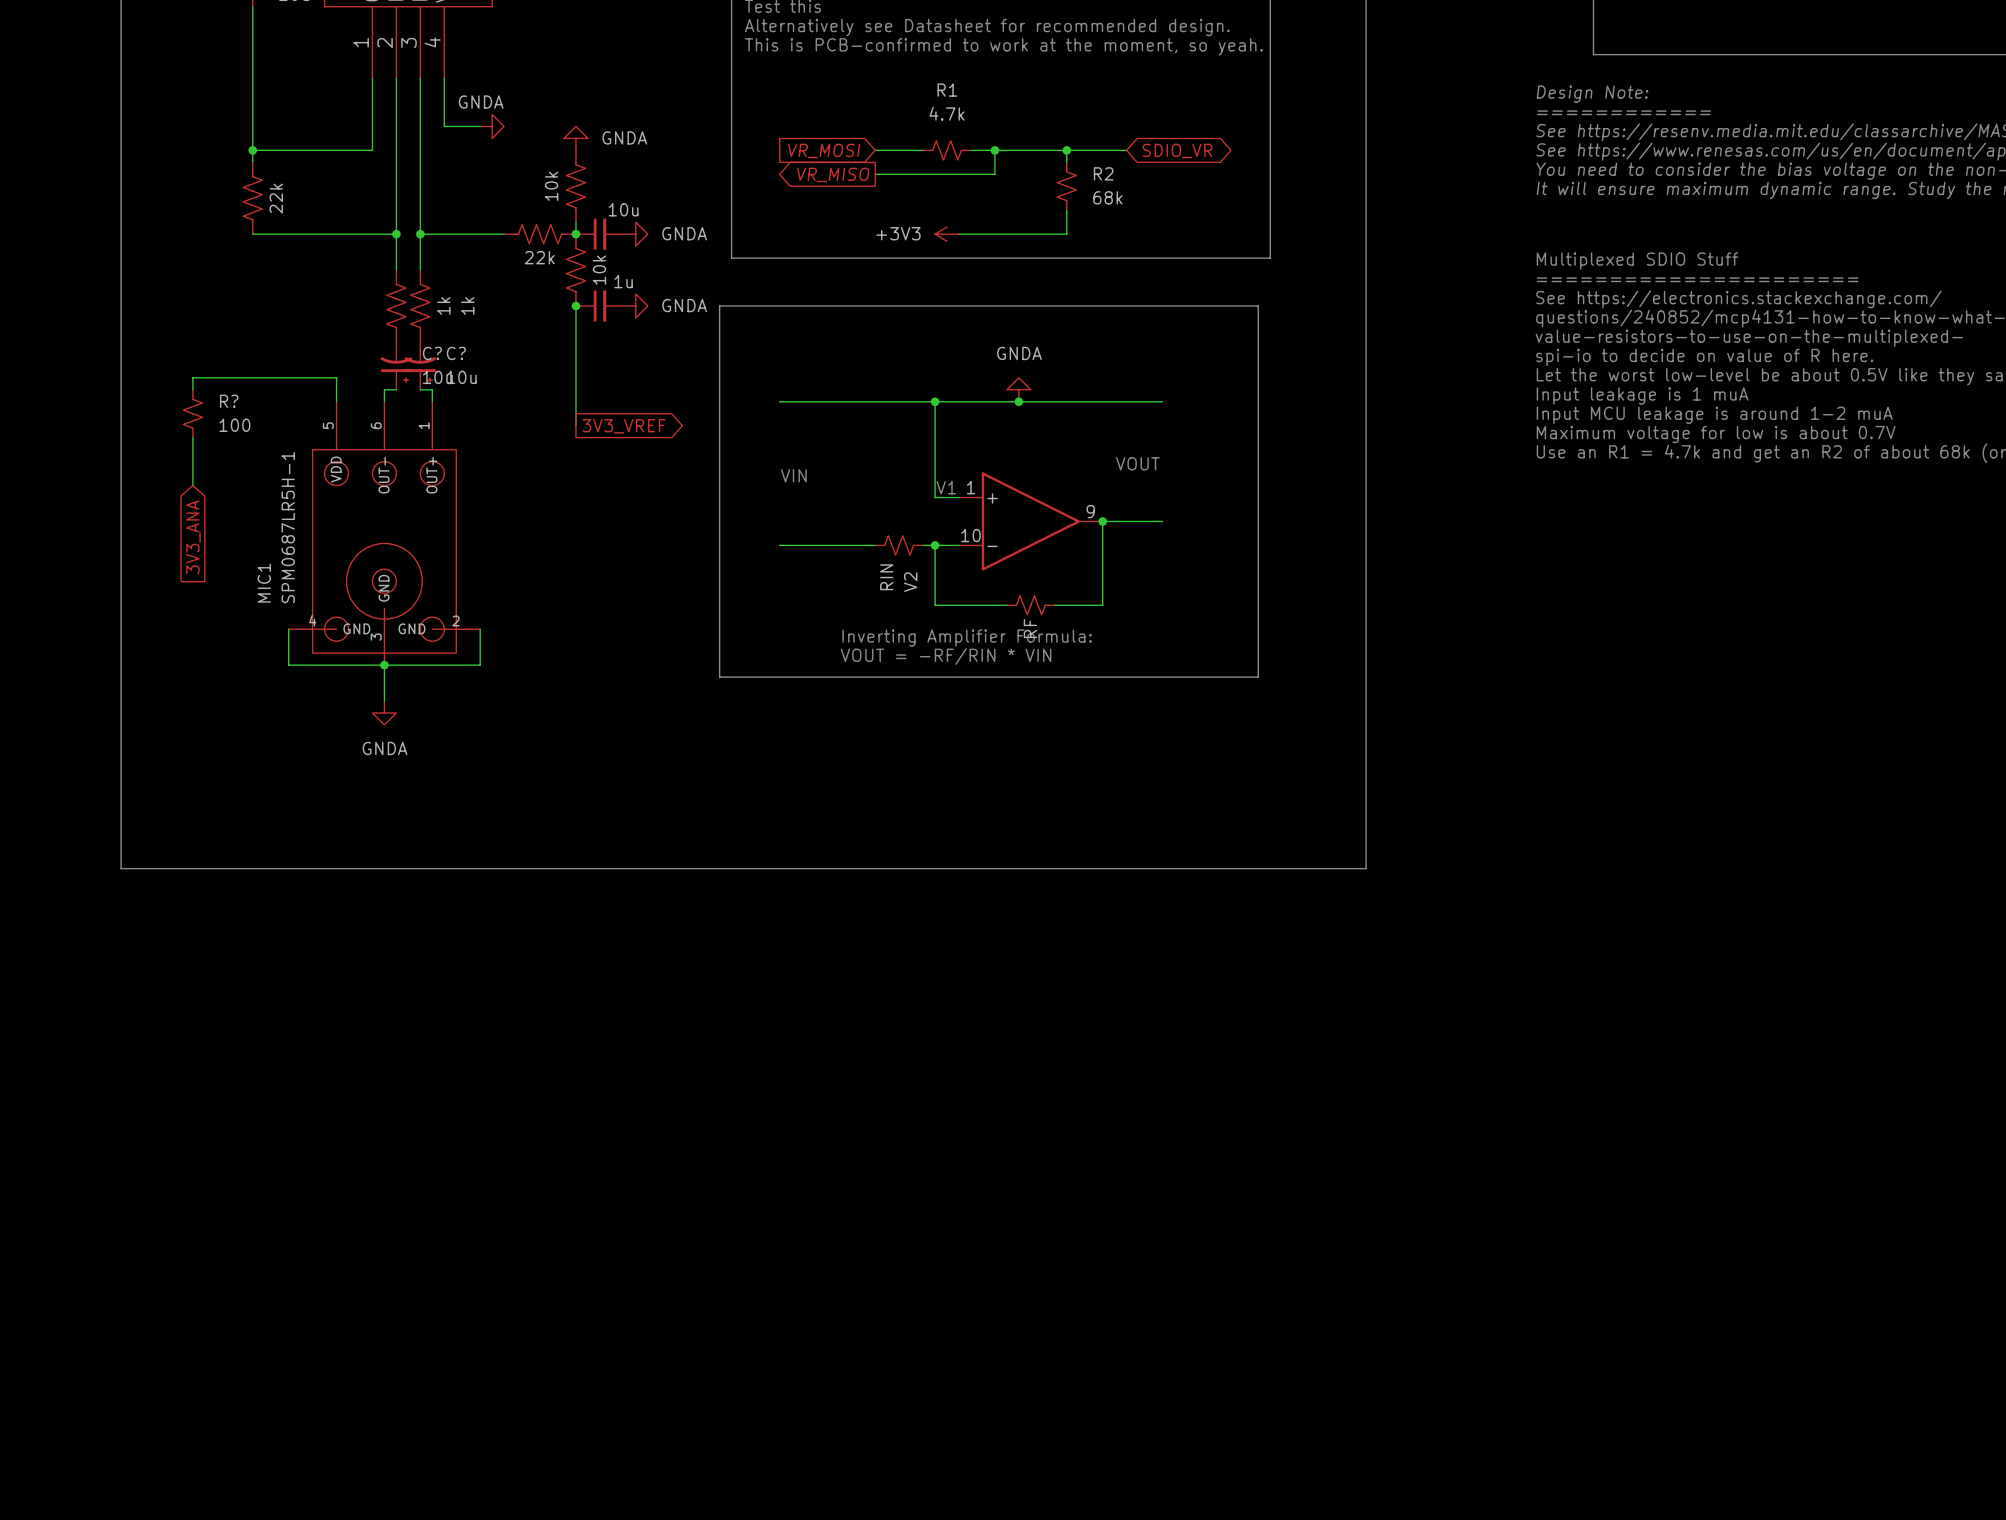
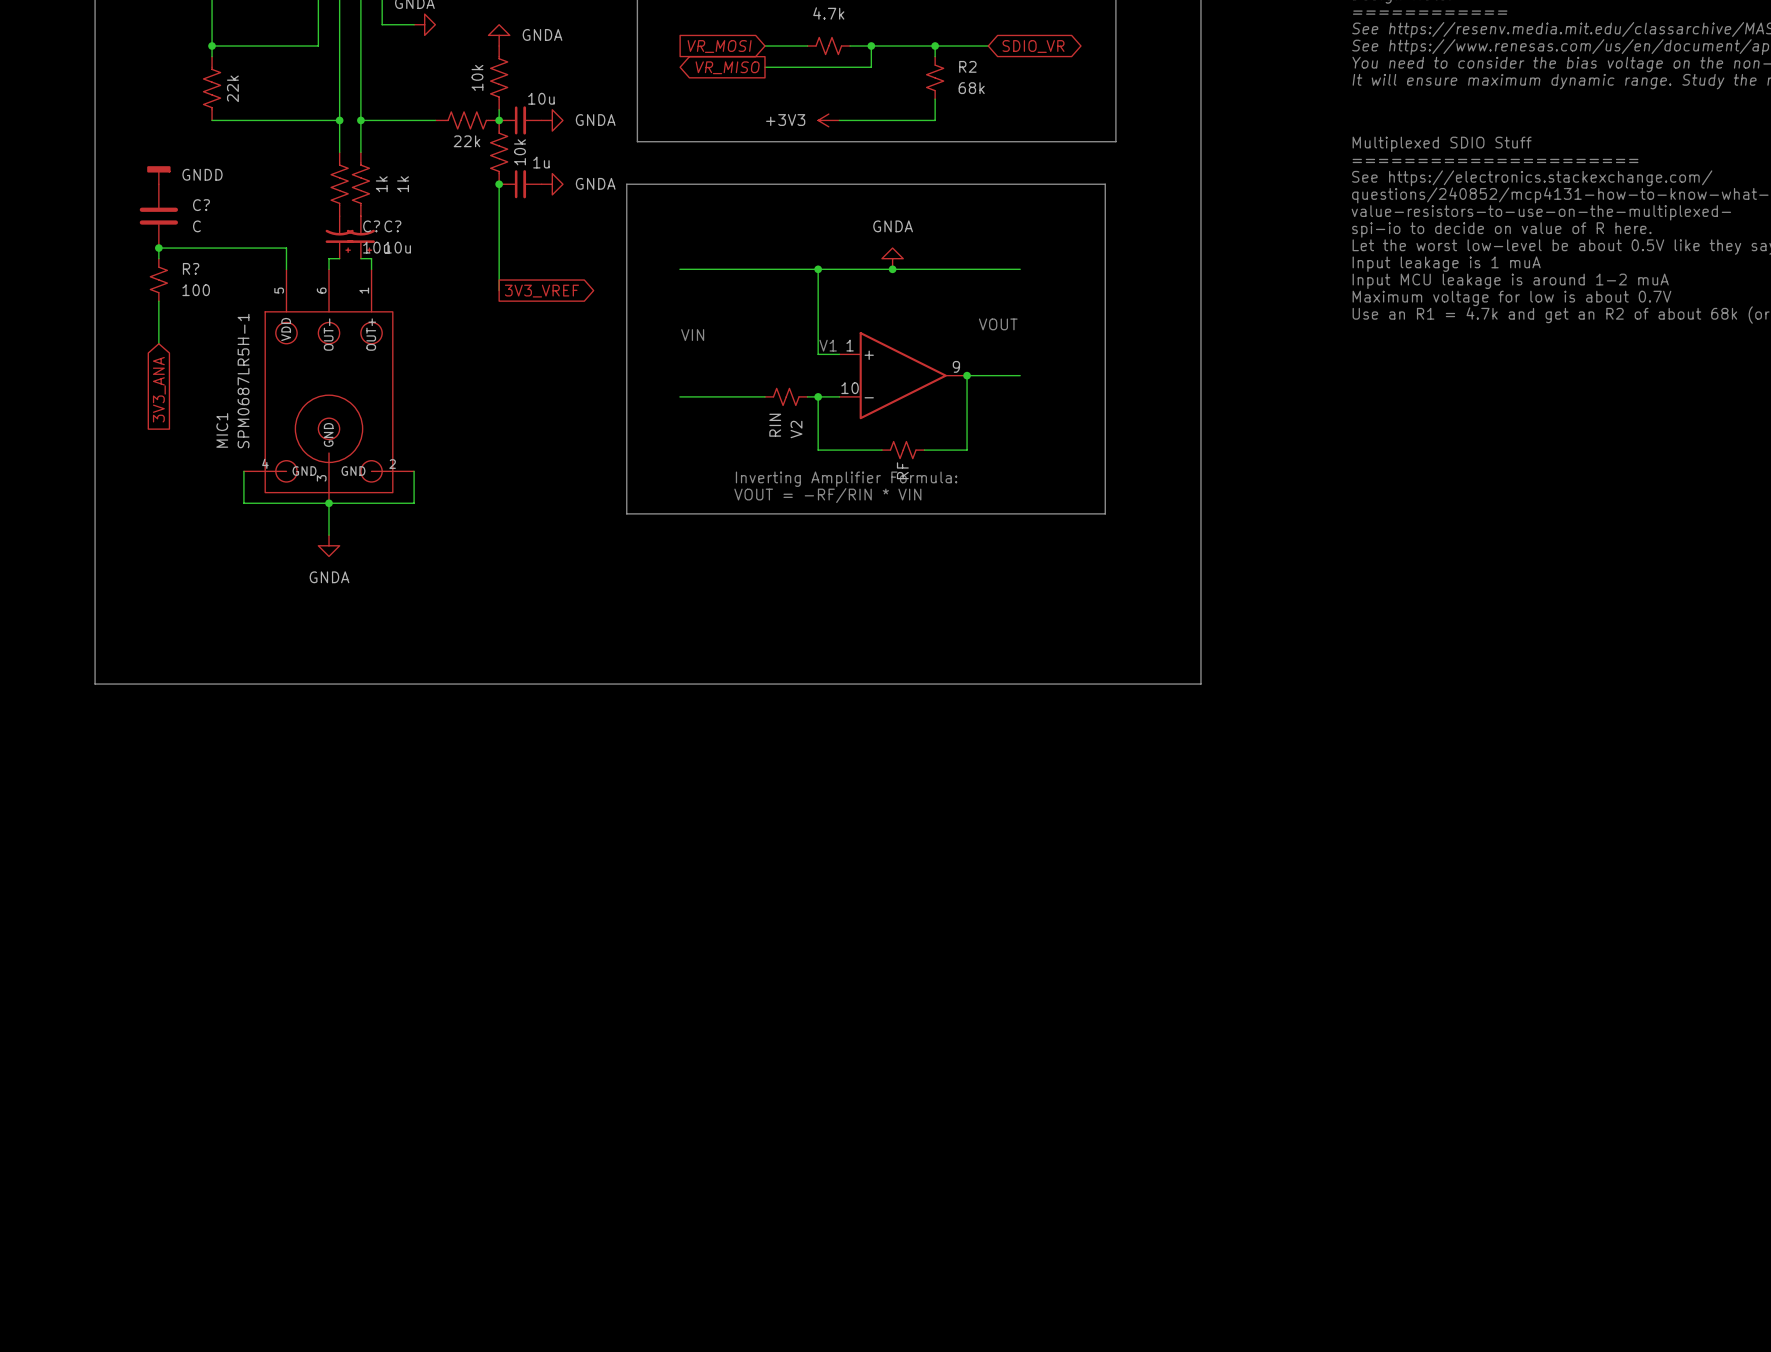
power symbol: none -> GNDD (158, 175)
C?: none -> C (158, 216)
junction: none -> (158, 248)

